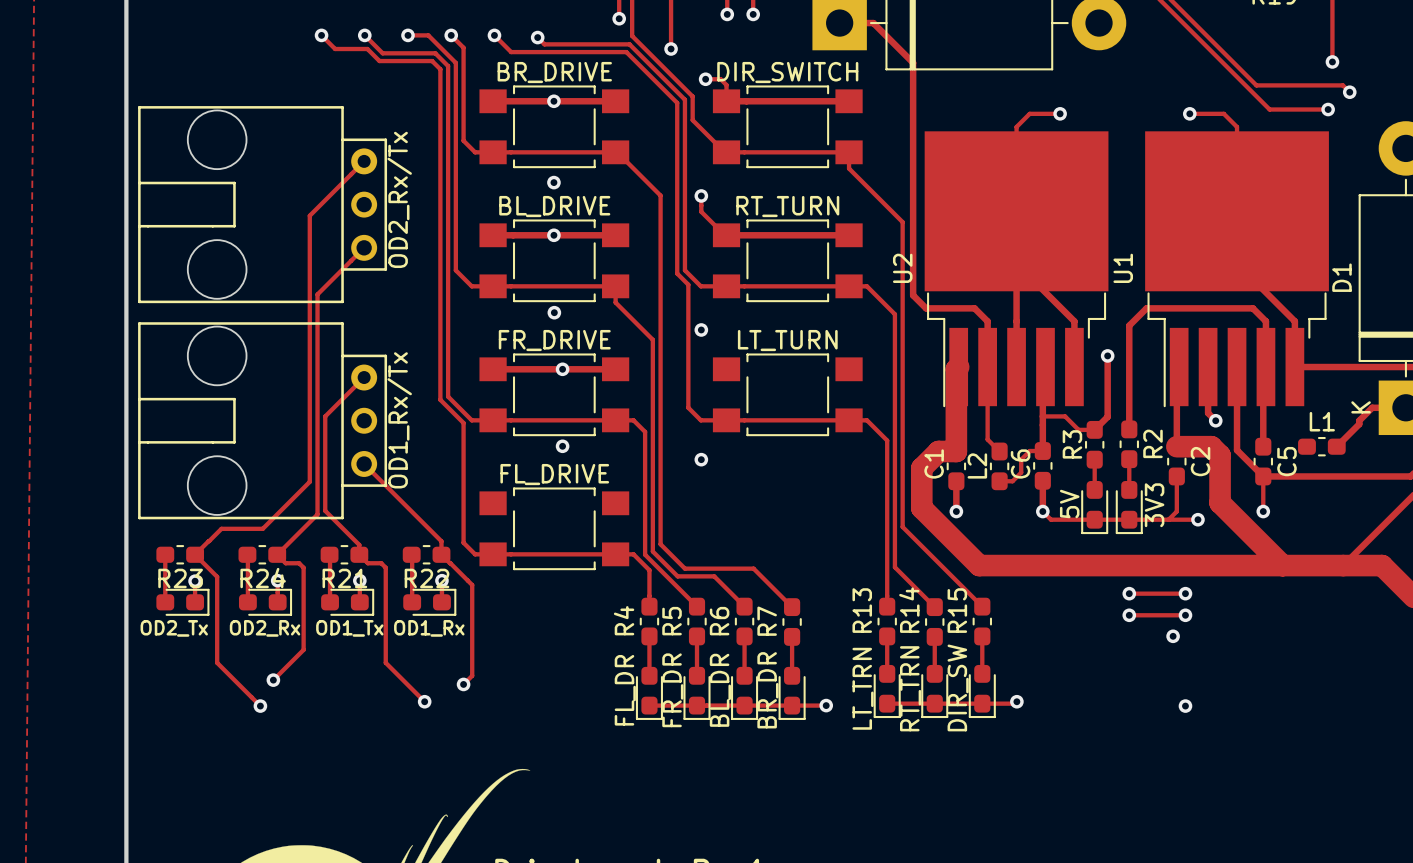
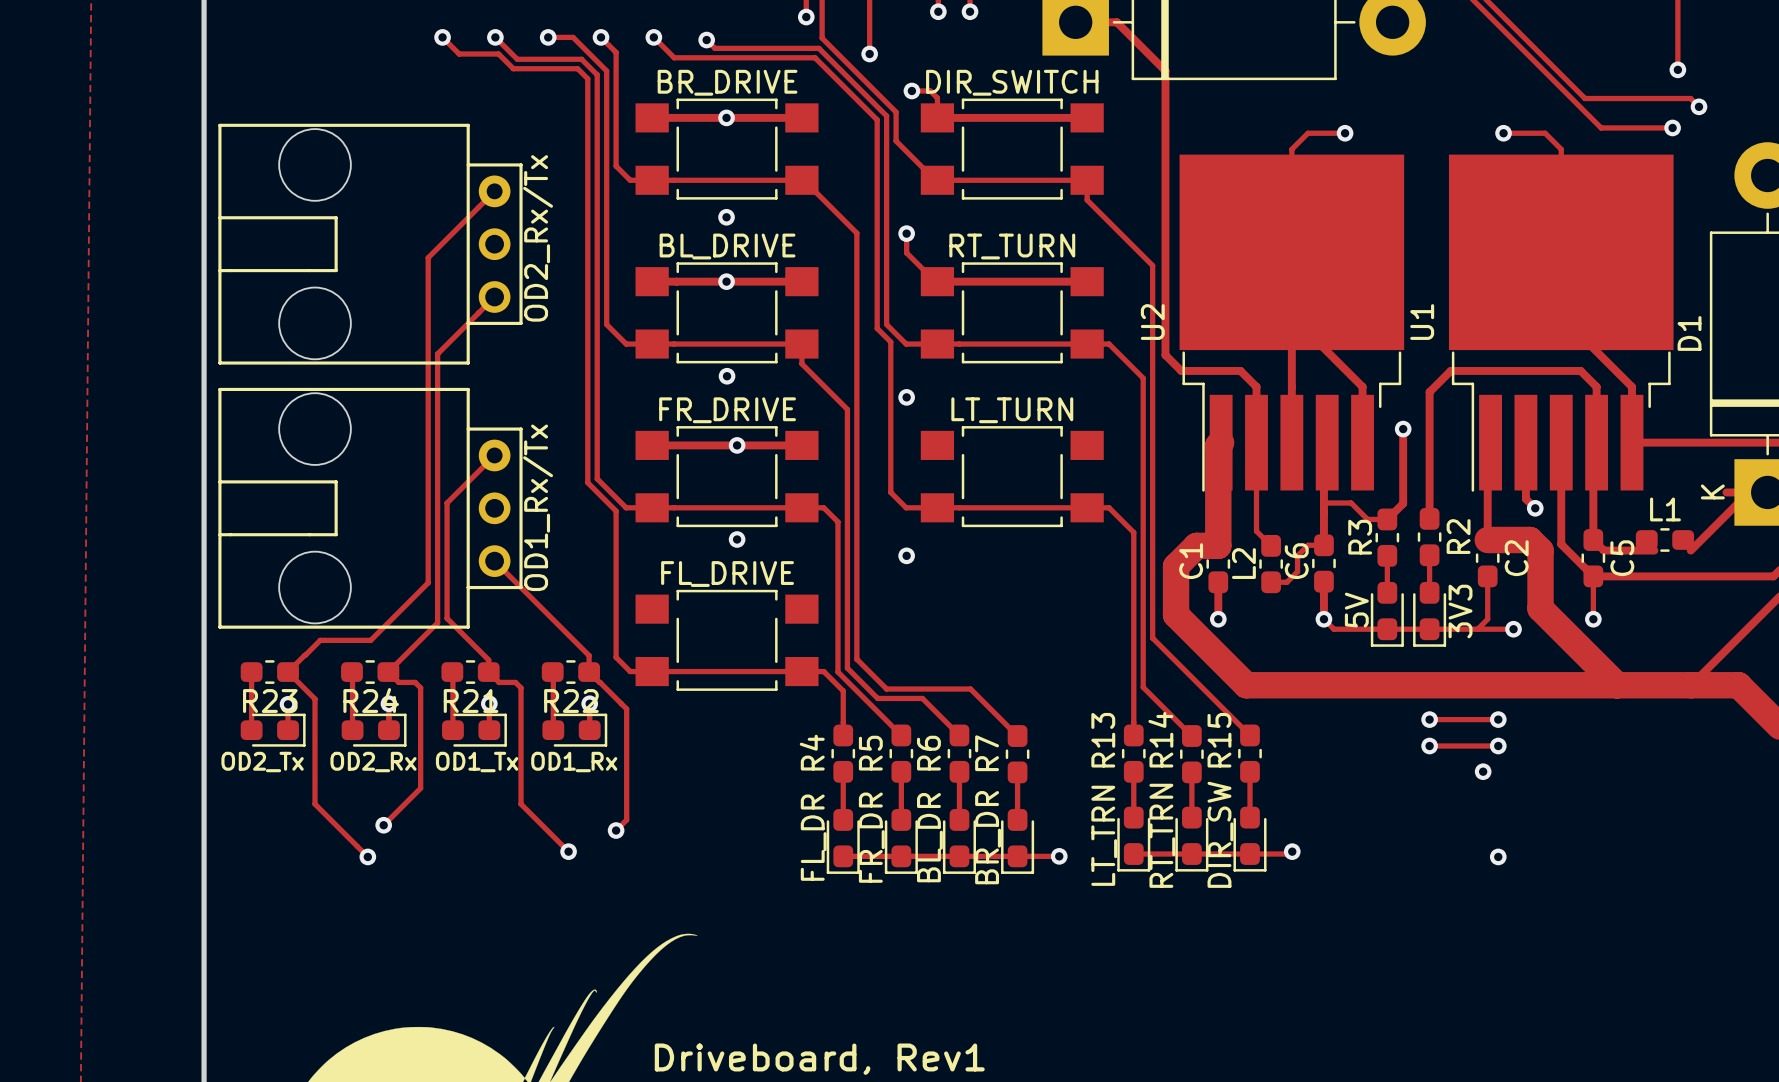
track: none -> (1746, 487) (1746, 494) (1690, 550)
track: (1372, 407) (1336, 446) -> none
track: none -> (1593, 539) (1603, 550) (1654, 550)

